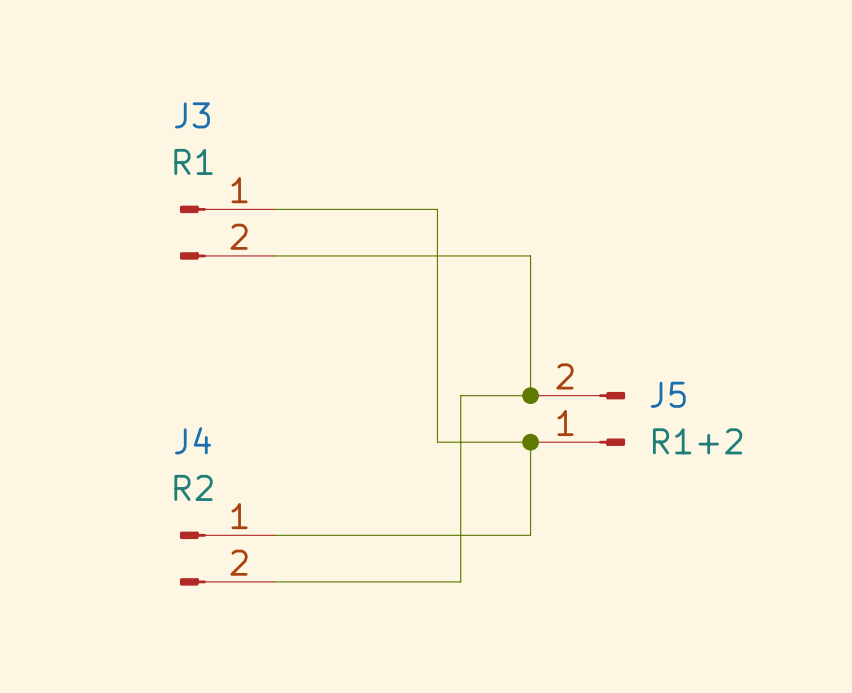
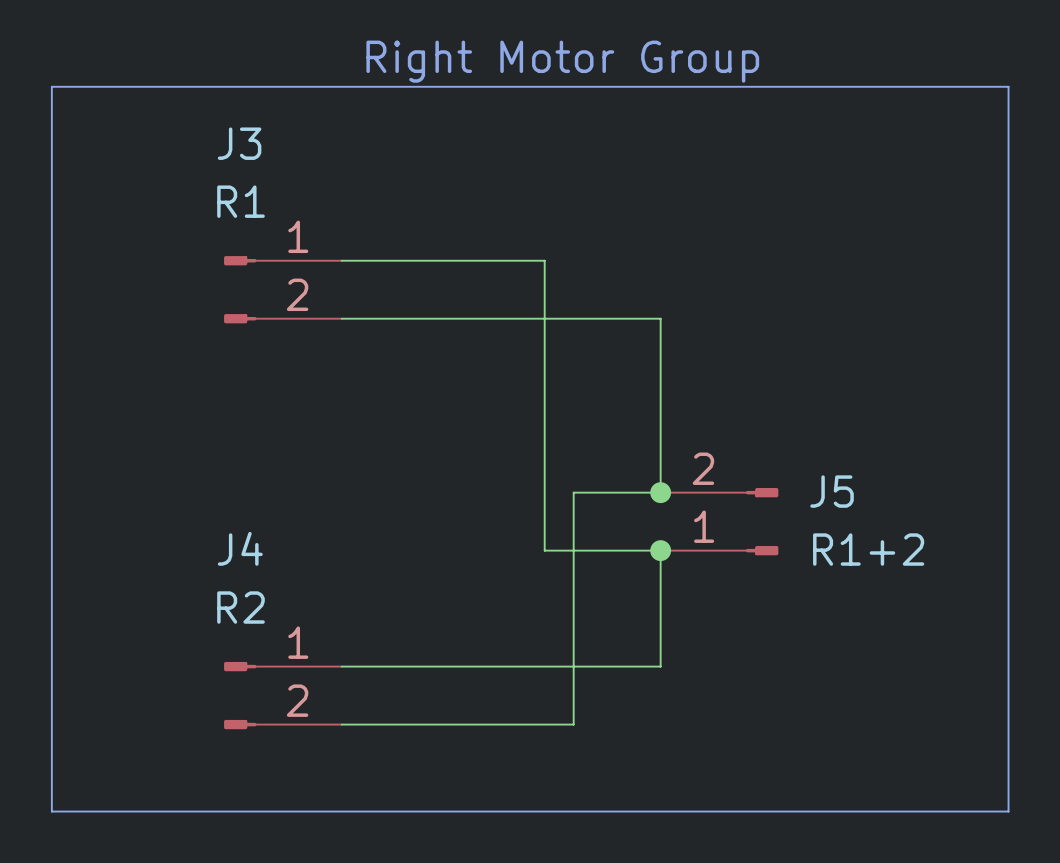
text: none -> Right Motor Group (562, 61)
line: none -> (51, 86) (1008, 86) (1008, 811) (51, 811) (51, 86)

